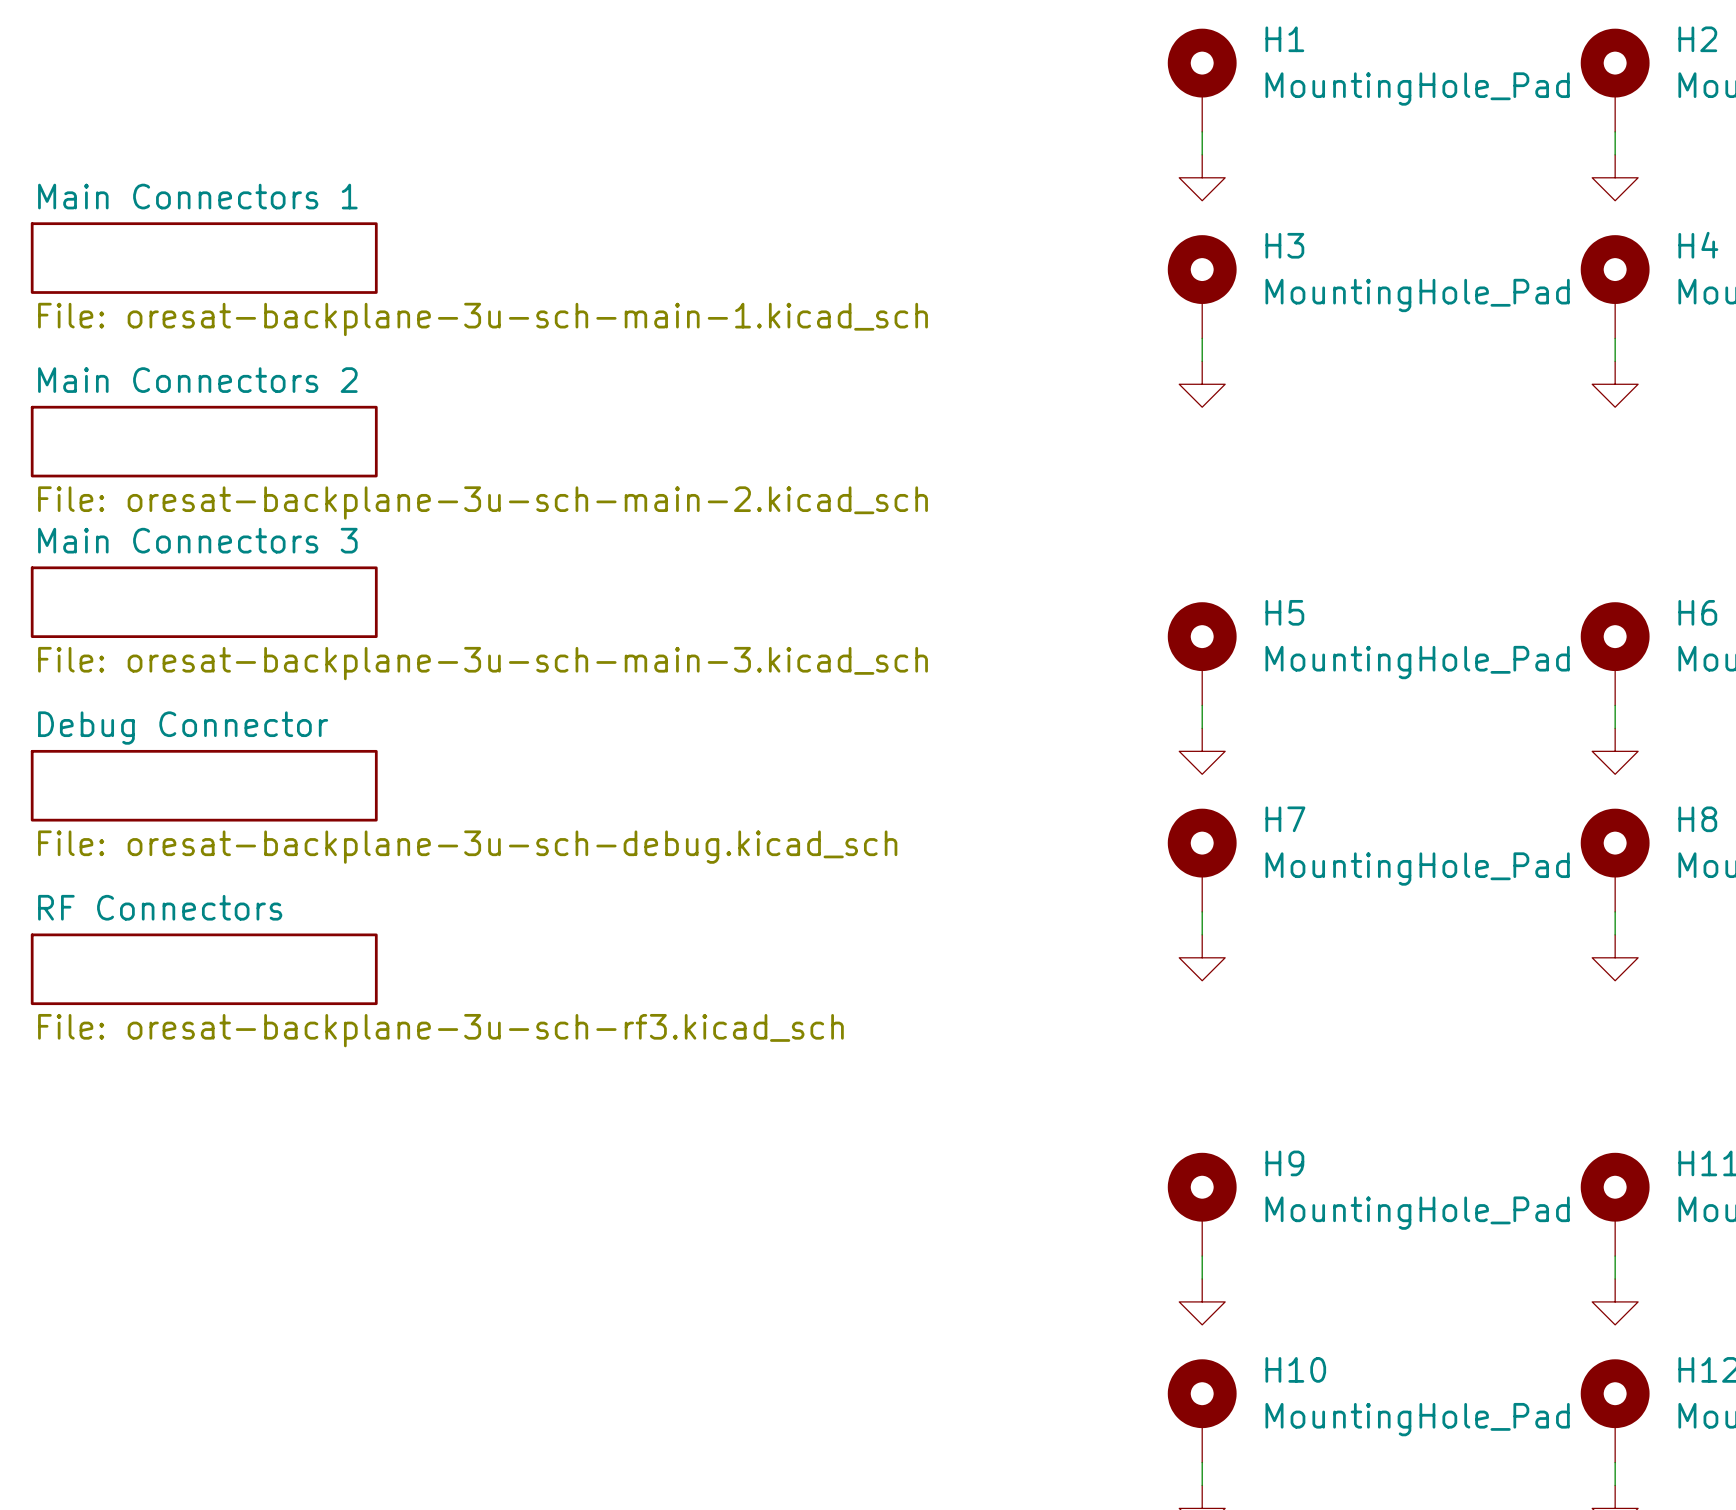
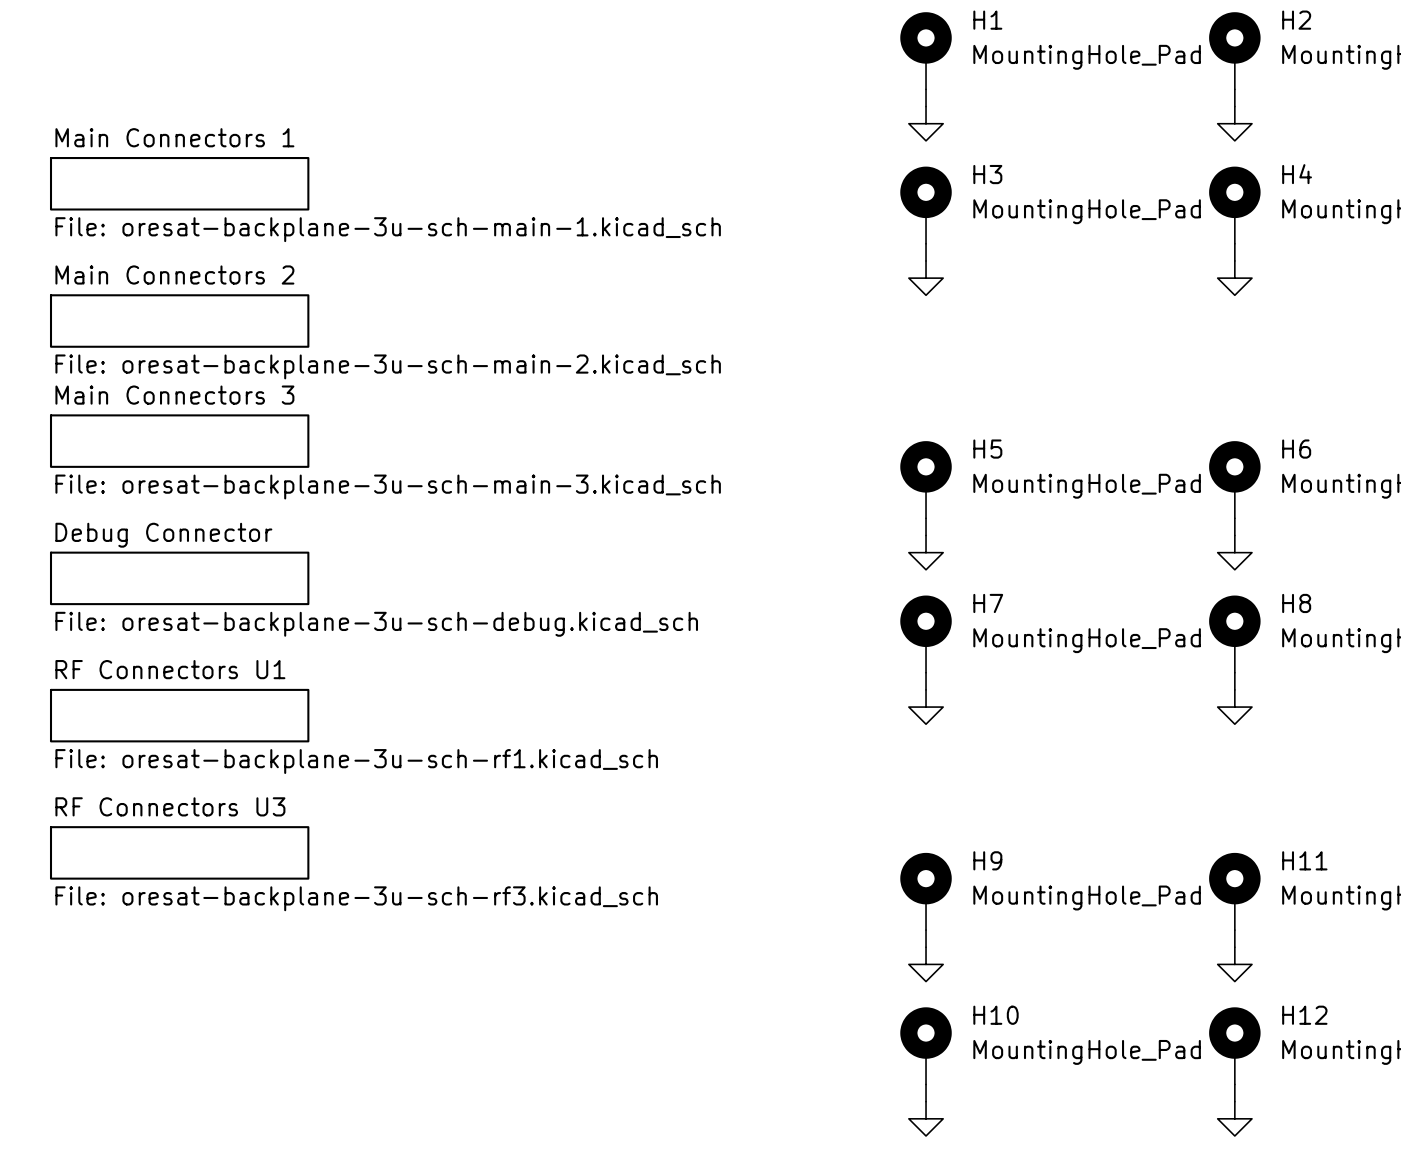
sheet RF Connectors name: RF Connectors (160, 907) -> RF Connectors U1 (170, 669)
sheet RF Connectors value: File: oresat-backplane-3u-sch-rf3.kicad_sch (440, 1030) -> File: oresat-backplane-3u-sch-rf1.kicad_sch (356, 761)
sheet RF Connectors U3: none -> File: oresat-backplane-3u-sch-rf3.kicad_sch (179, 852)

